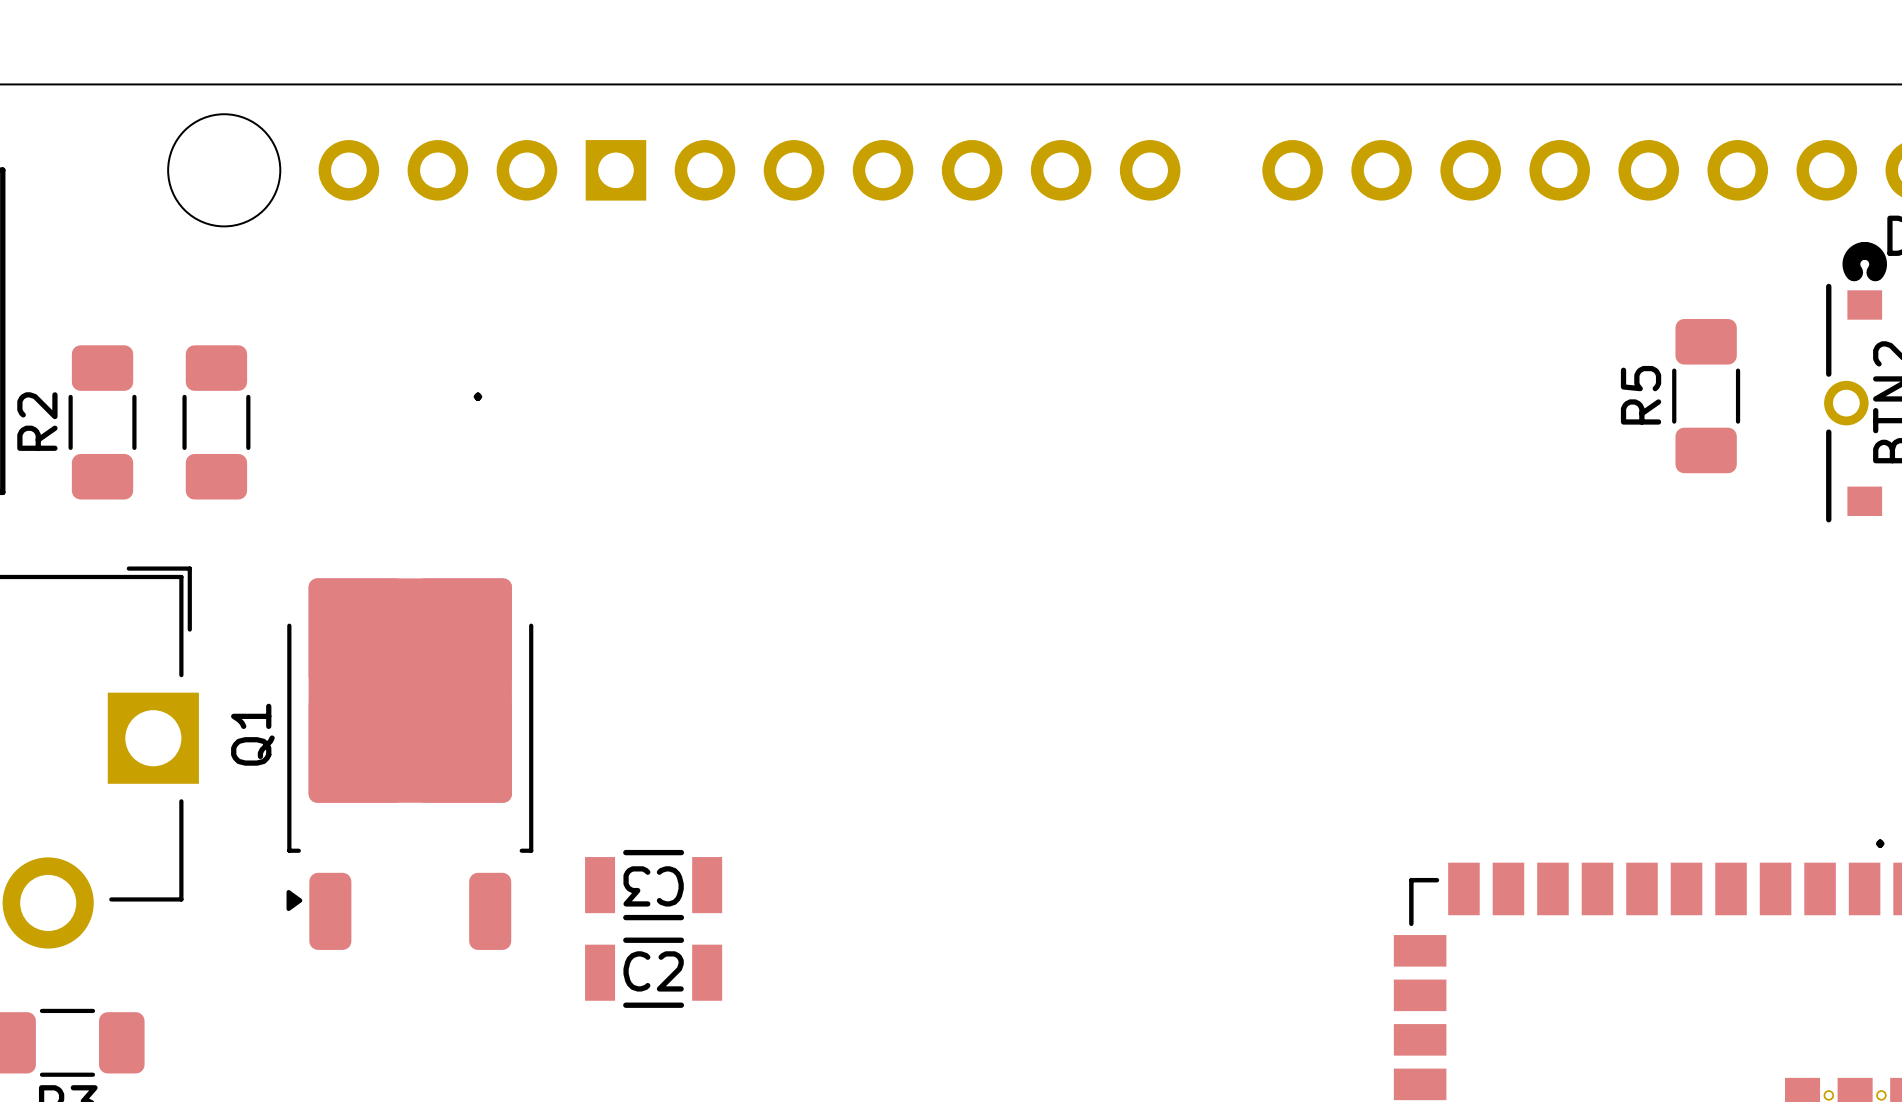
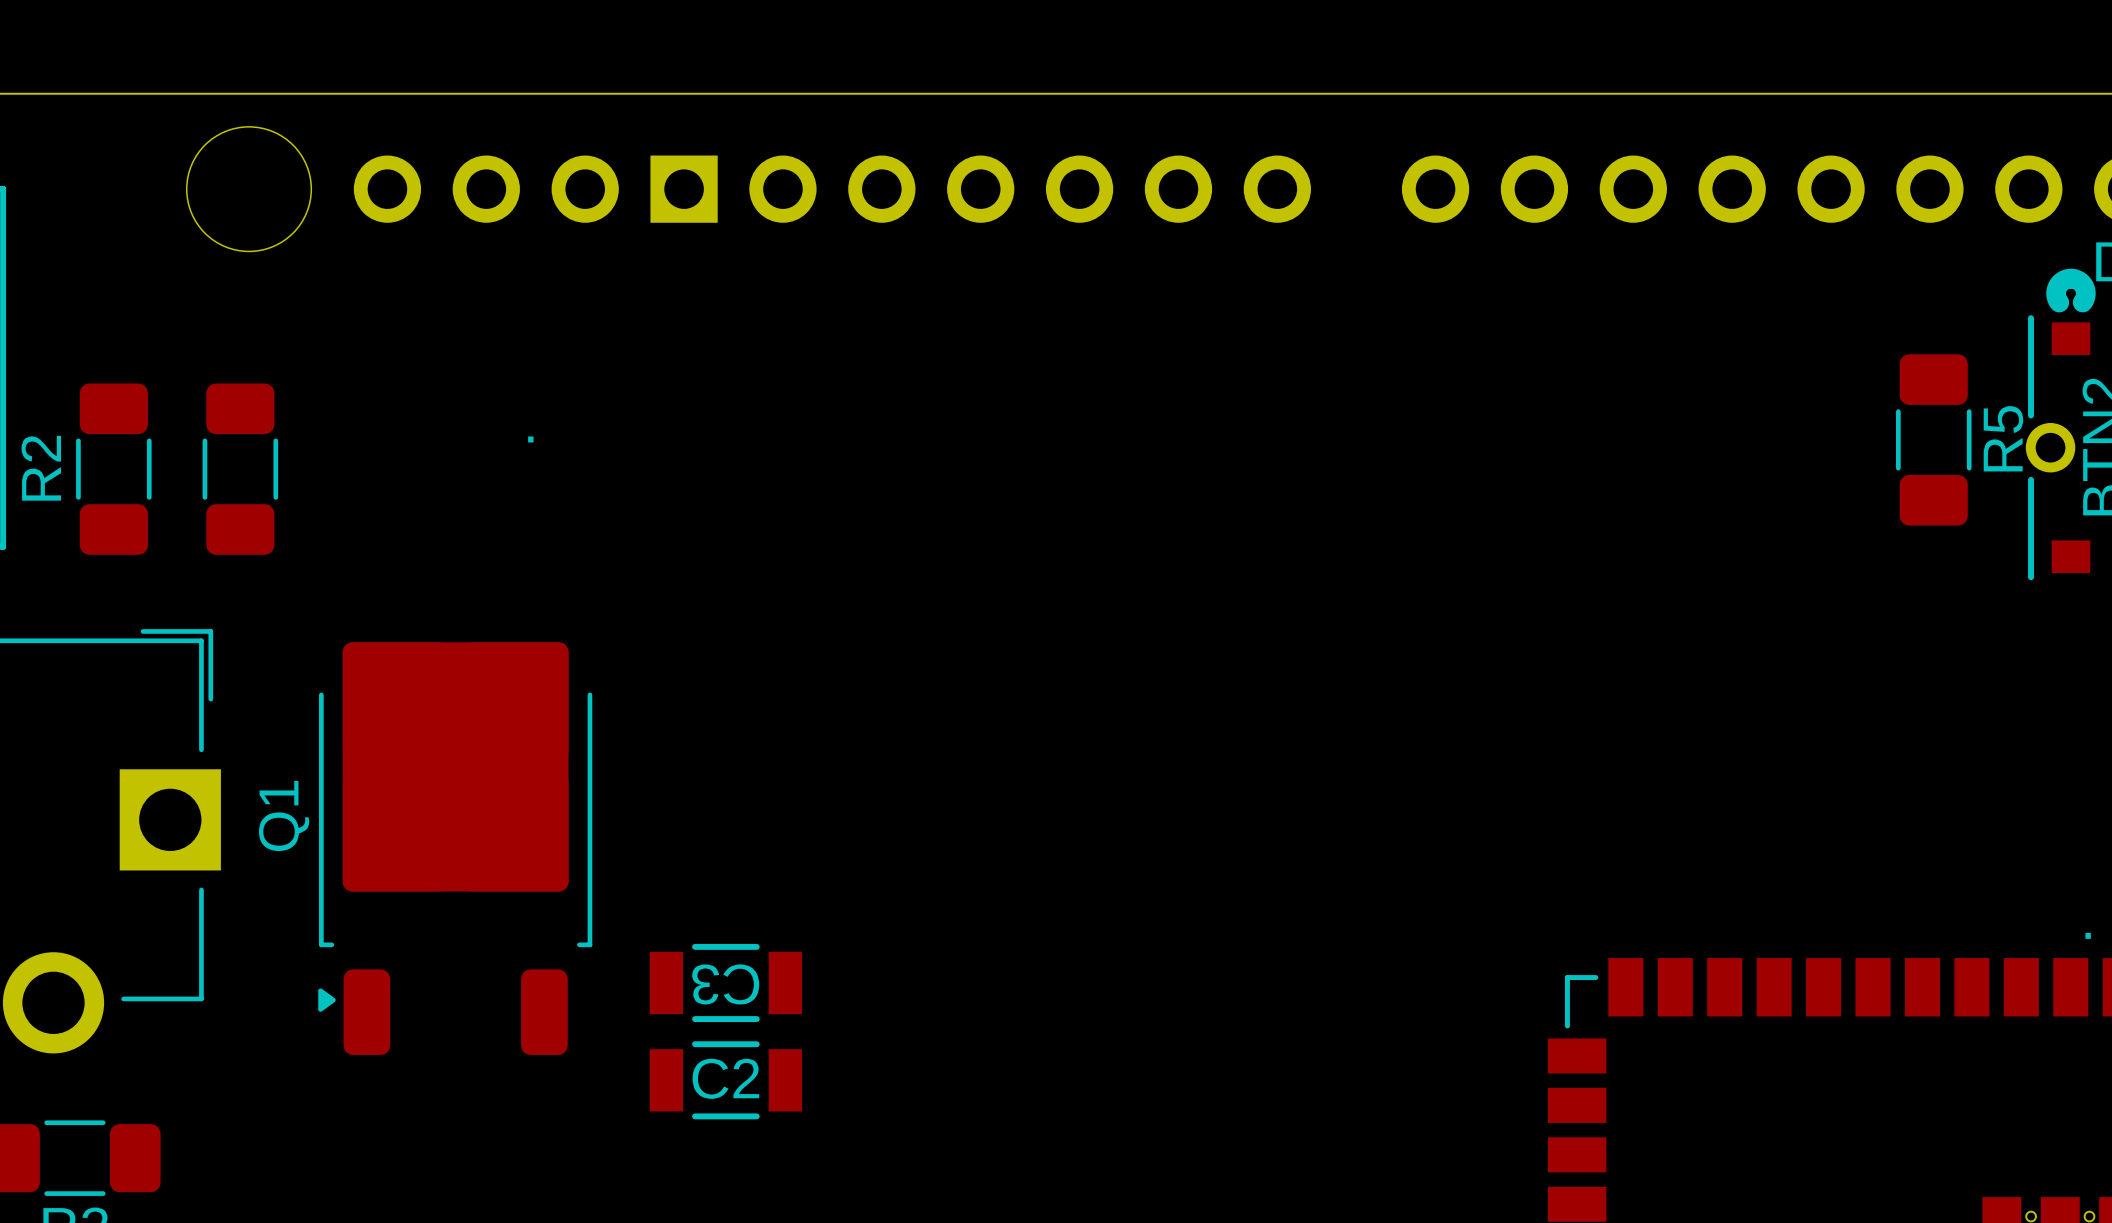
R5 name position: R5 (1641, 395) -> R5 (2003, 438)
R5 position: (1706, 396) -> (1933, 439)

